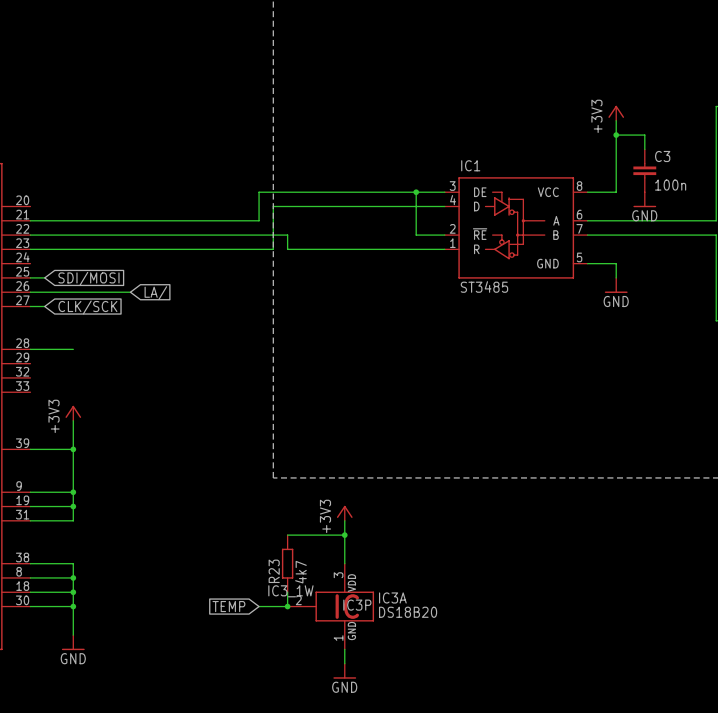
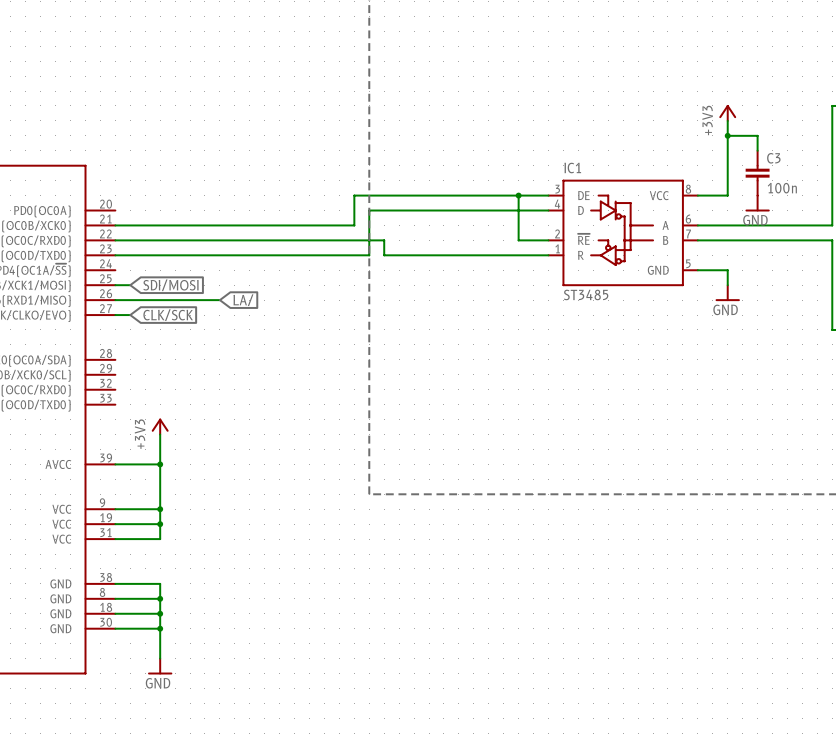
wire: (30, 349) (73, 349) -> none
power symbol: +3V3 (344, 513) -> none
wire: (344, 520) (344, 563) -> none
wire: (287, 535) (344, 535) -> none
junction: (344, 535) -> none
R23: 4k7 (287, 563) -> none
wire: (287, 592) (287, 606) (259, 606) -> none
global label: TEMP (228, 606) -> none
junction: (287, 606) -> none
IC3_1W: (301, 606) -> none
IC3A: DS18B20 (344, 606) -> none
IC3P: (344, 606) -> none
wire: (344, 649) (344, 663) -> none
power symbol: GND (344, 671) -> none

